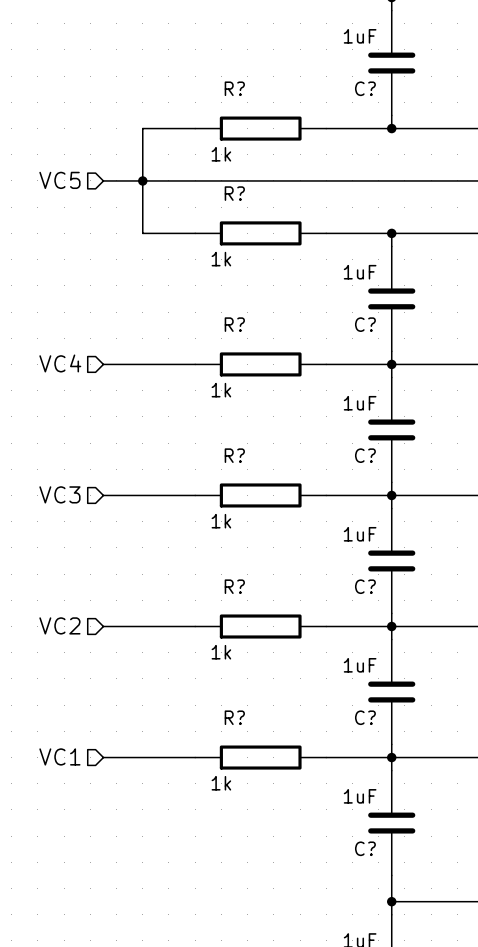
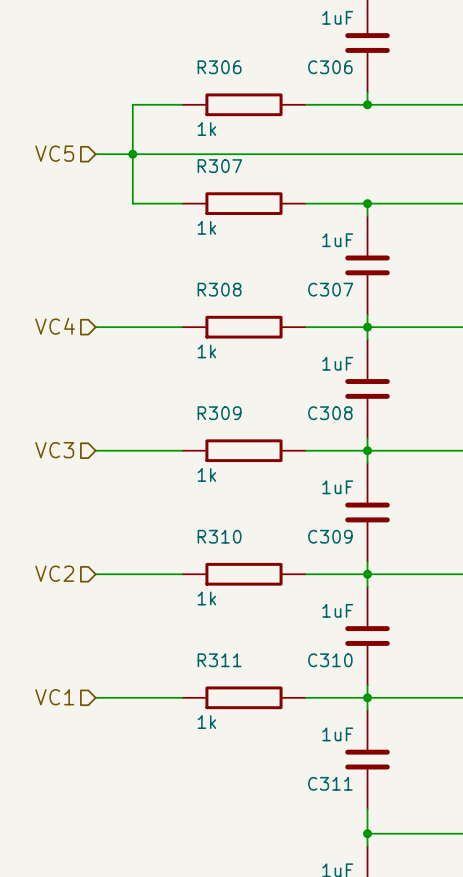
R? name: R? (234, 88) -> R306 (219, 67)
C? name: C? (365, 88) -> C306 (330, 67)
R? name: R? (234, 193) -> R307 (219, 166)
R? name: R? (234, 324) -> R308 (219, 289)
C? name: C? (365, 324) -> C307 (330, 289)
R? name: R? (234, 455) -> R309 (219, 413)
C? name: C? (365, 455) -> C308 (330, 413)
R? name: R? (234, 586) -> R310 (219, 536)
C? name: C? (365, 586) -> C309 (330, 536)
R? name: R? (234, 717) -> R311 (219, 660)
C? name: C? (365, 717) -> C310 (330, 660)
C? name: C? (365, 848) -> C311 (330, 783)

